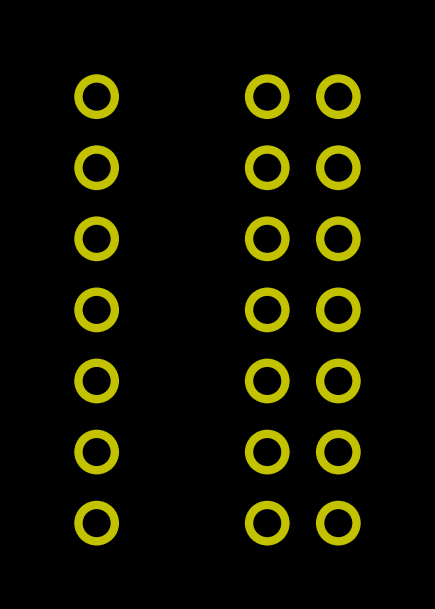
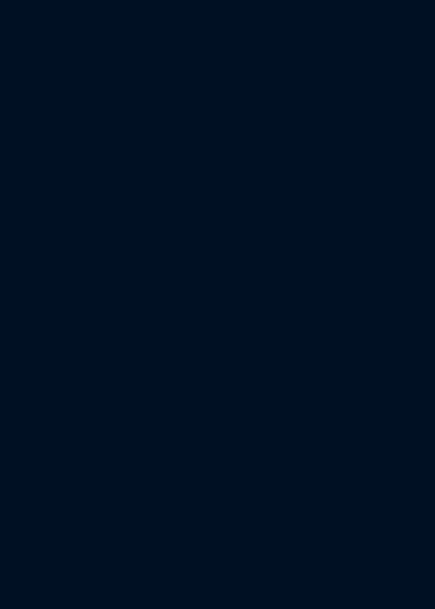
part: (96, 309) -> none
part: (302, 309) -> none

